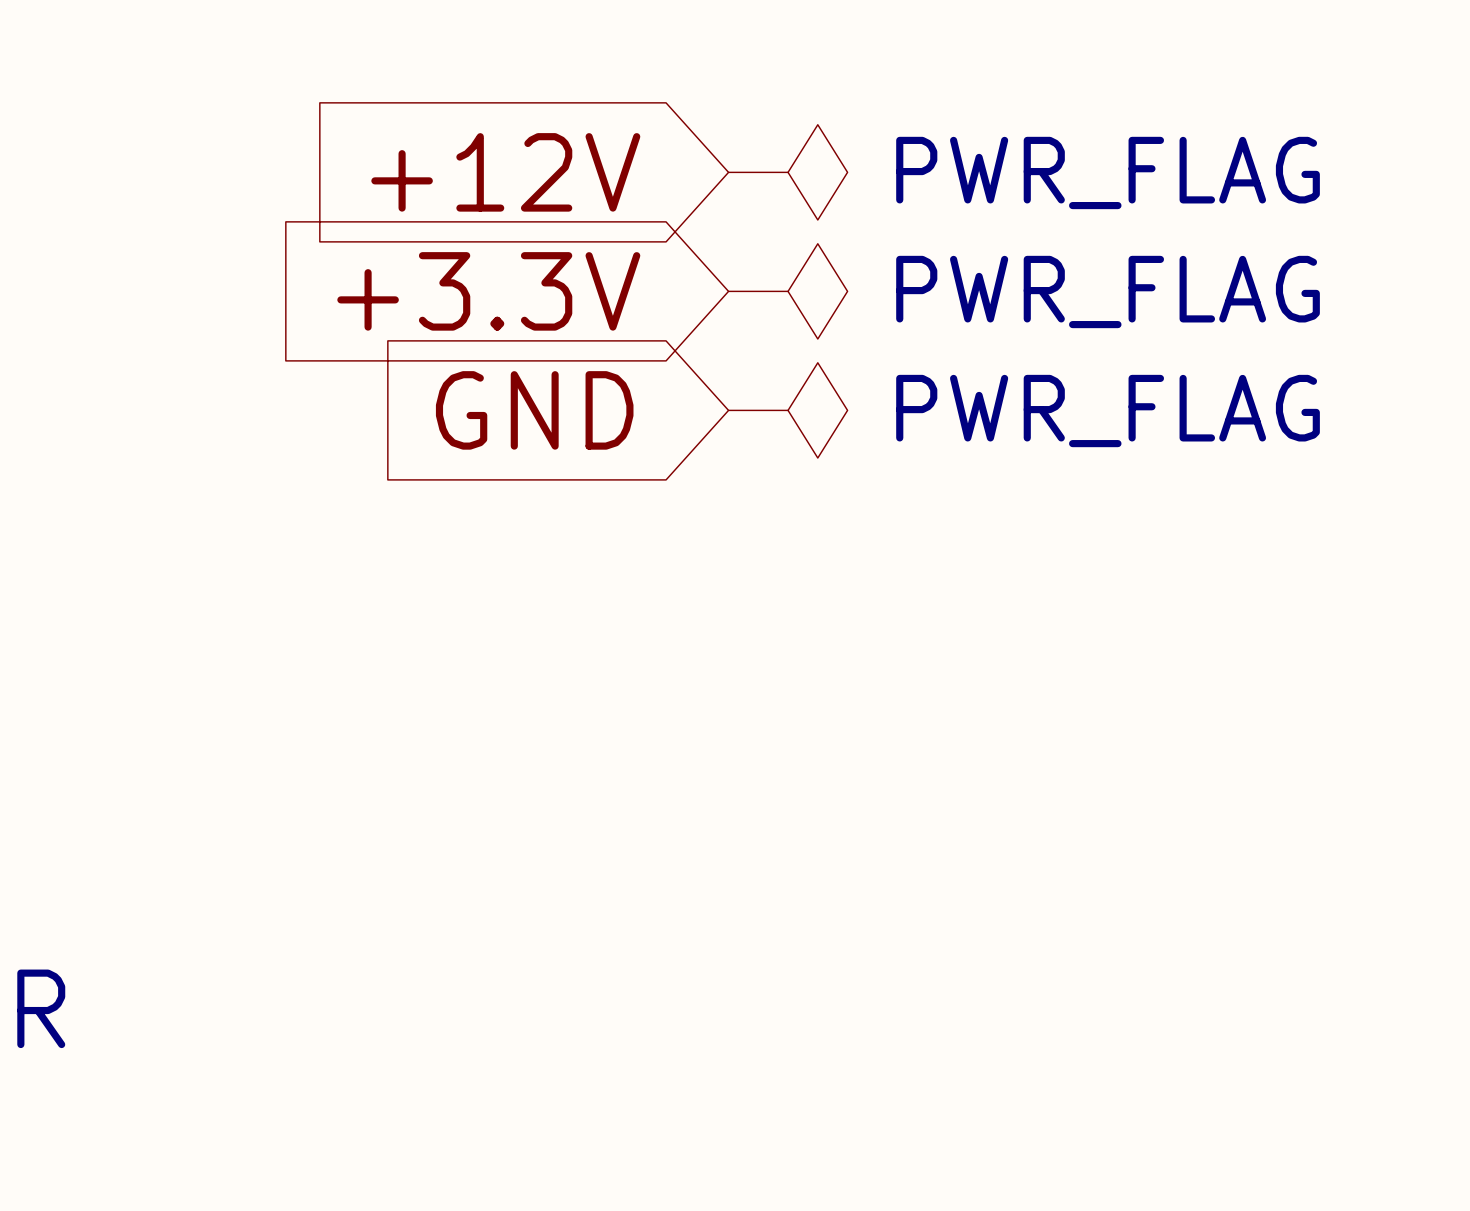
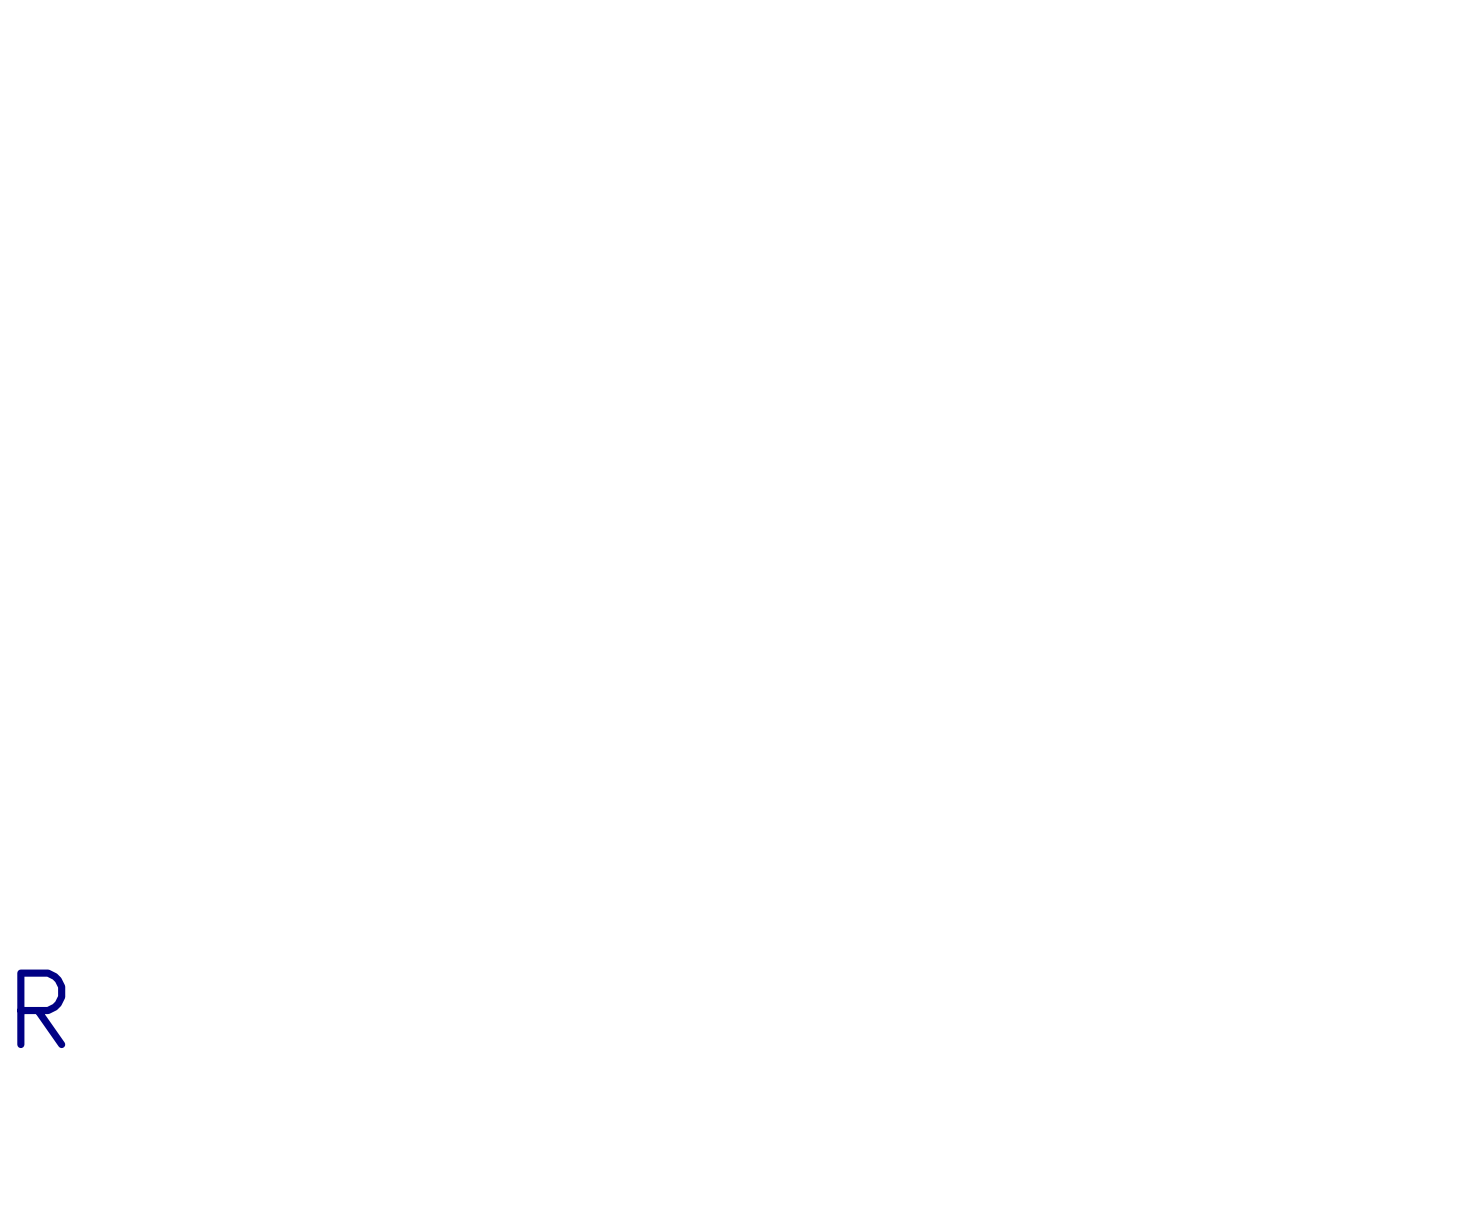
global label: +12V (505, 172) -> none
power symbol: PWR_FLAG (788, 172) -> none
global label: +3.3V (488, 291) -> none
power symbol: PWR_FLAG (788, 291) -> none
global label: GND (534, 410) -> none
power symbol: PWR_FLAG (788, 410) -> none

